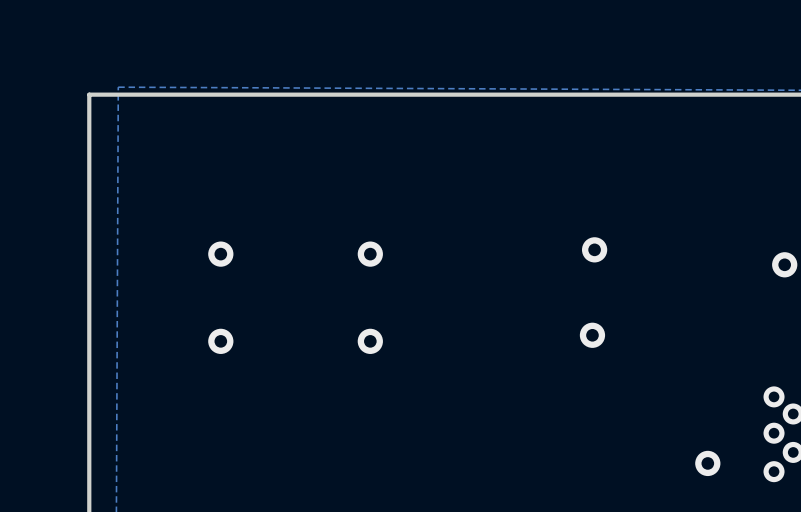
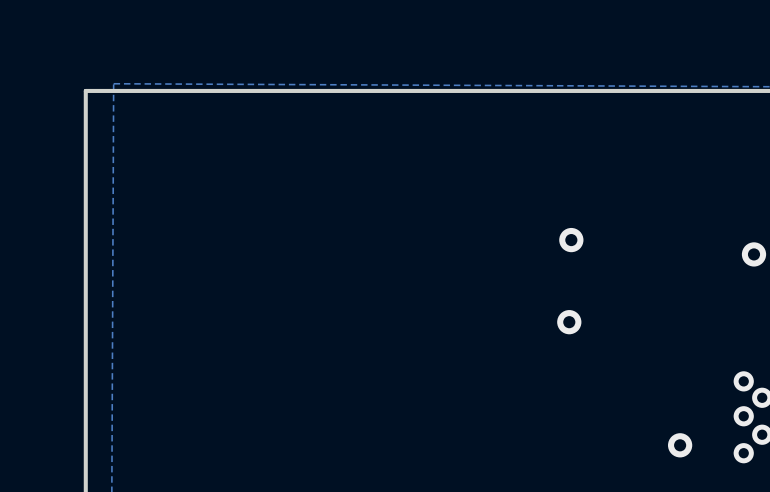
via: (220, 254) -> none
via: (370, 254) -> none
via: (220, 341) -> none
via: (370, 341) -> none

